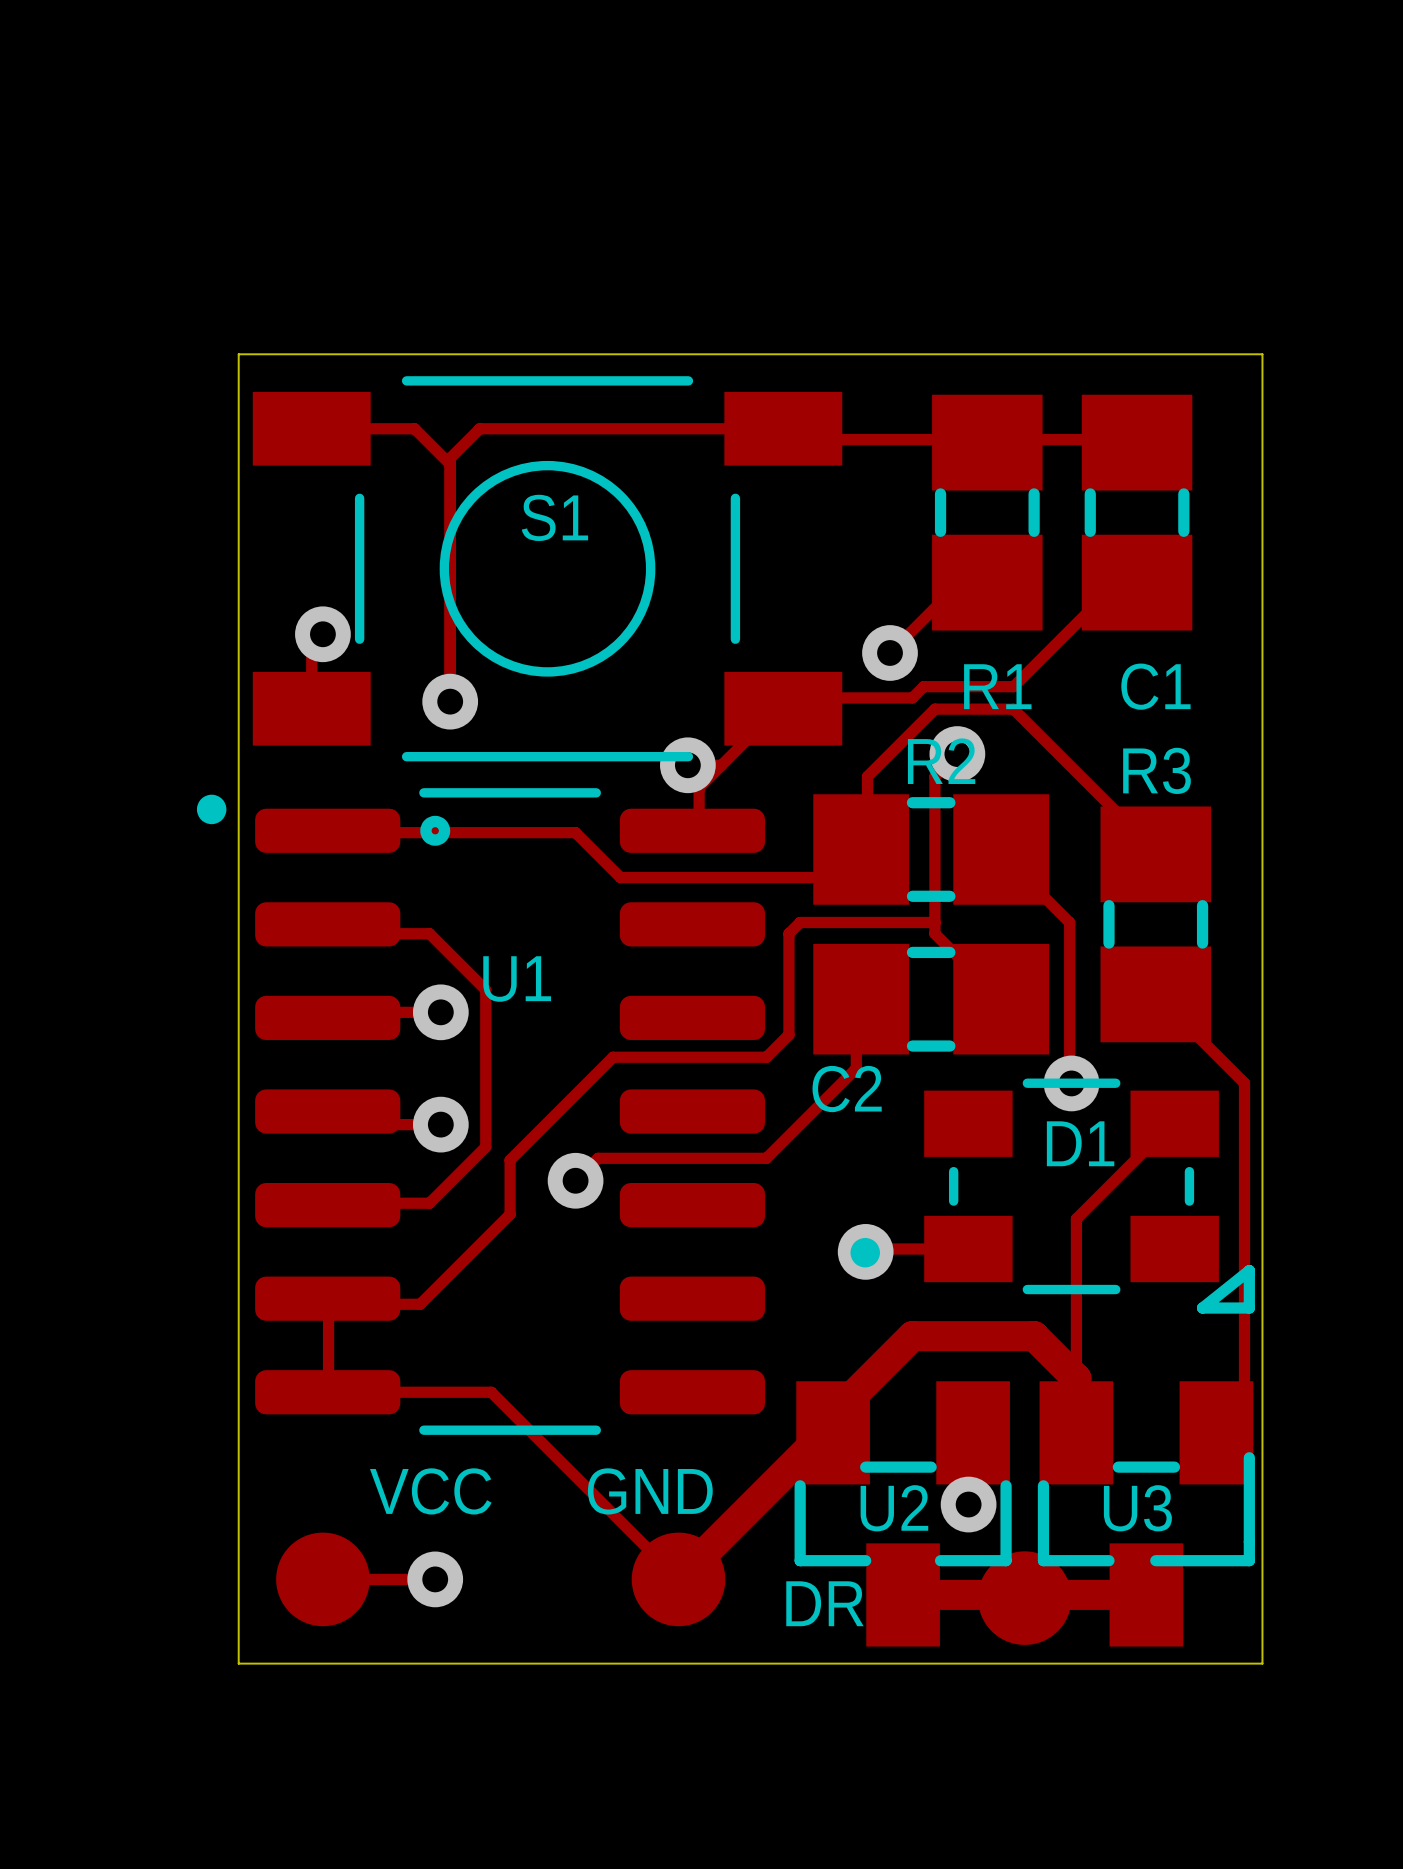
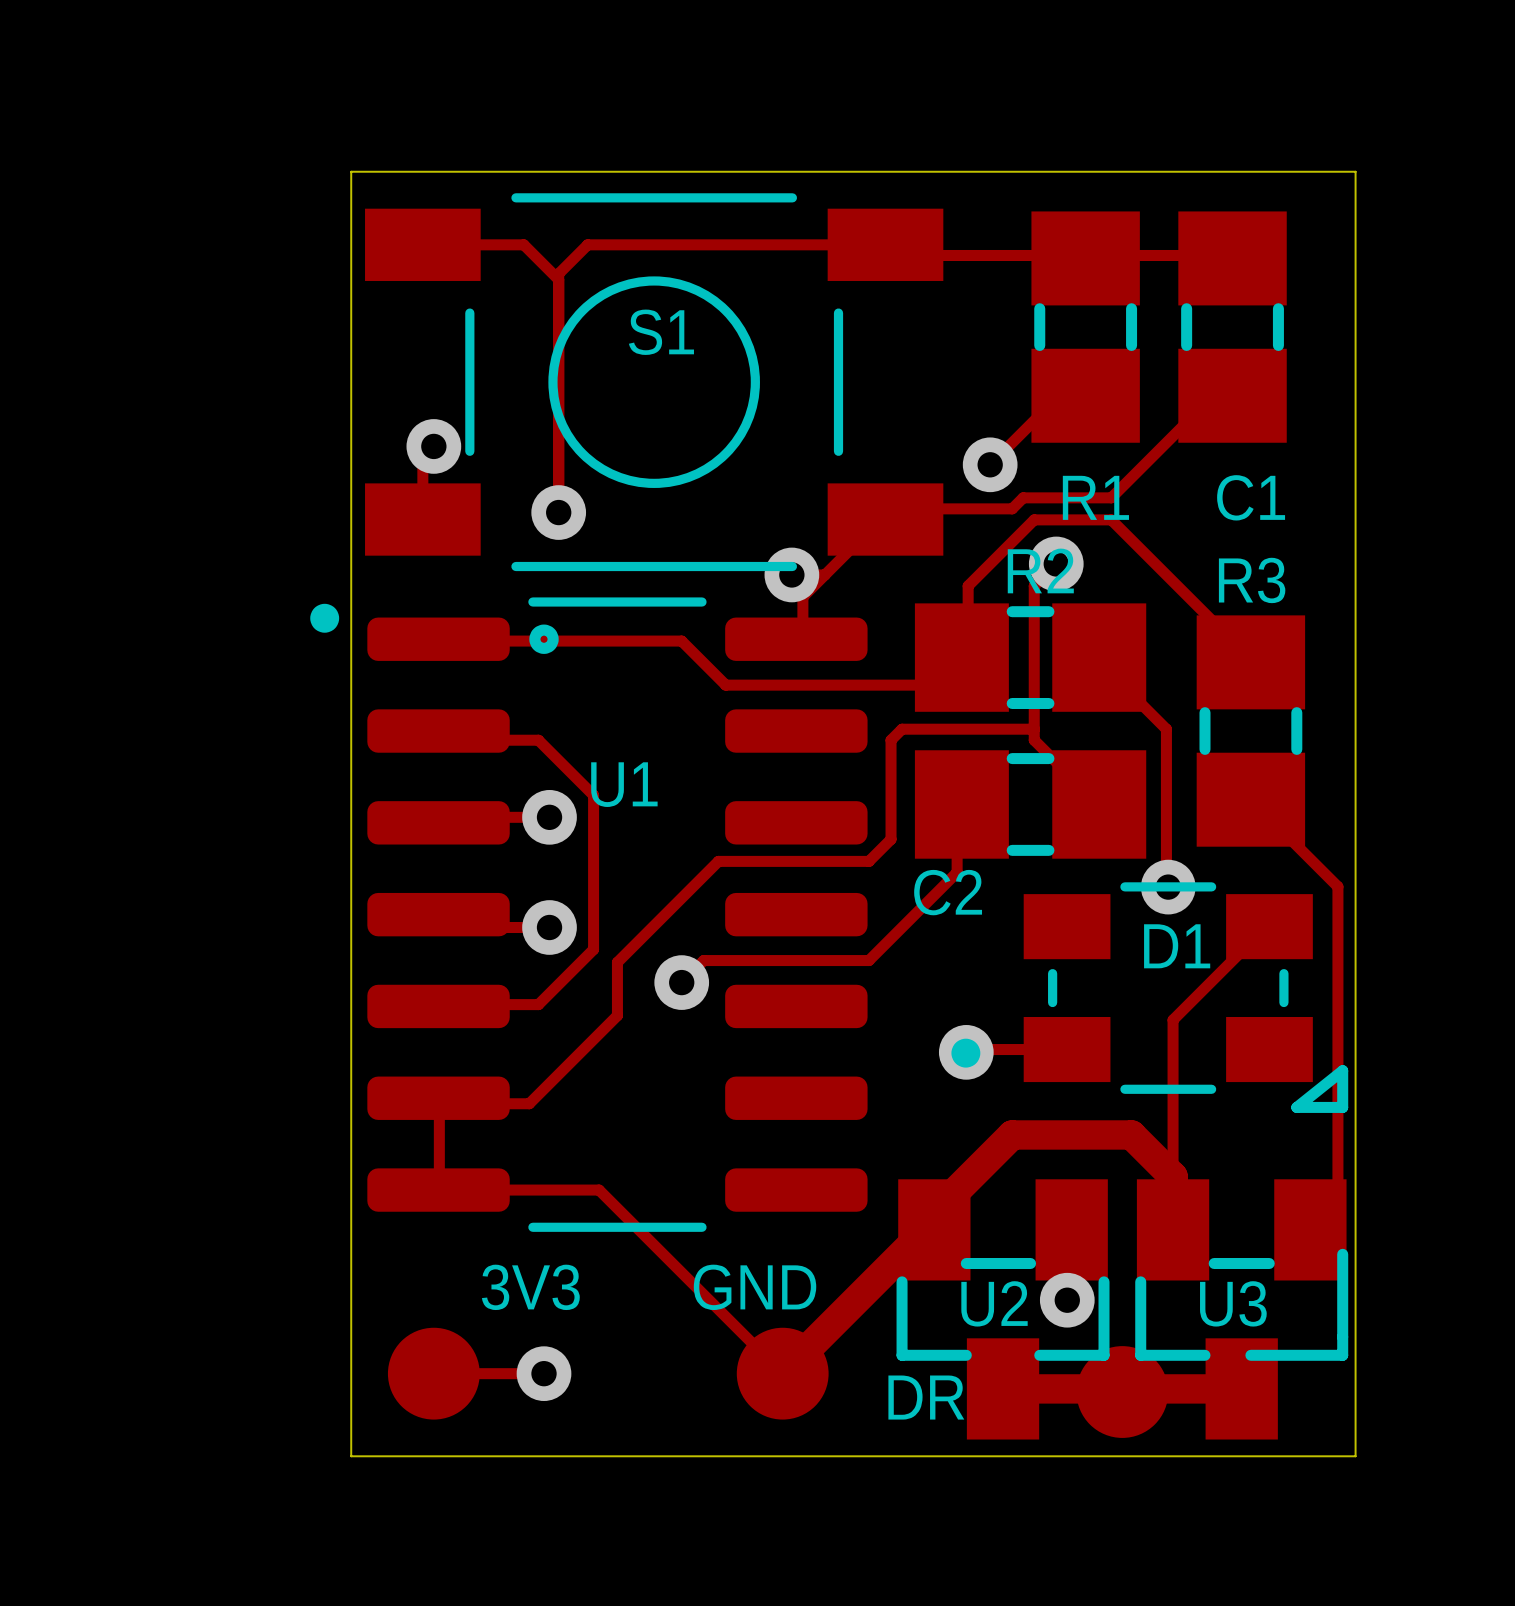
VCC name: VCC (430, 1491) -> 3V3 (530, 1287)

